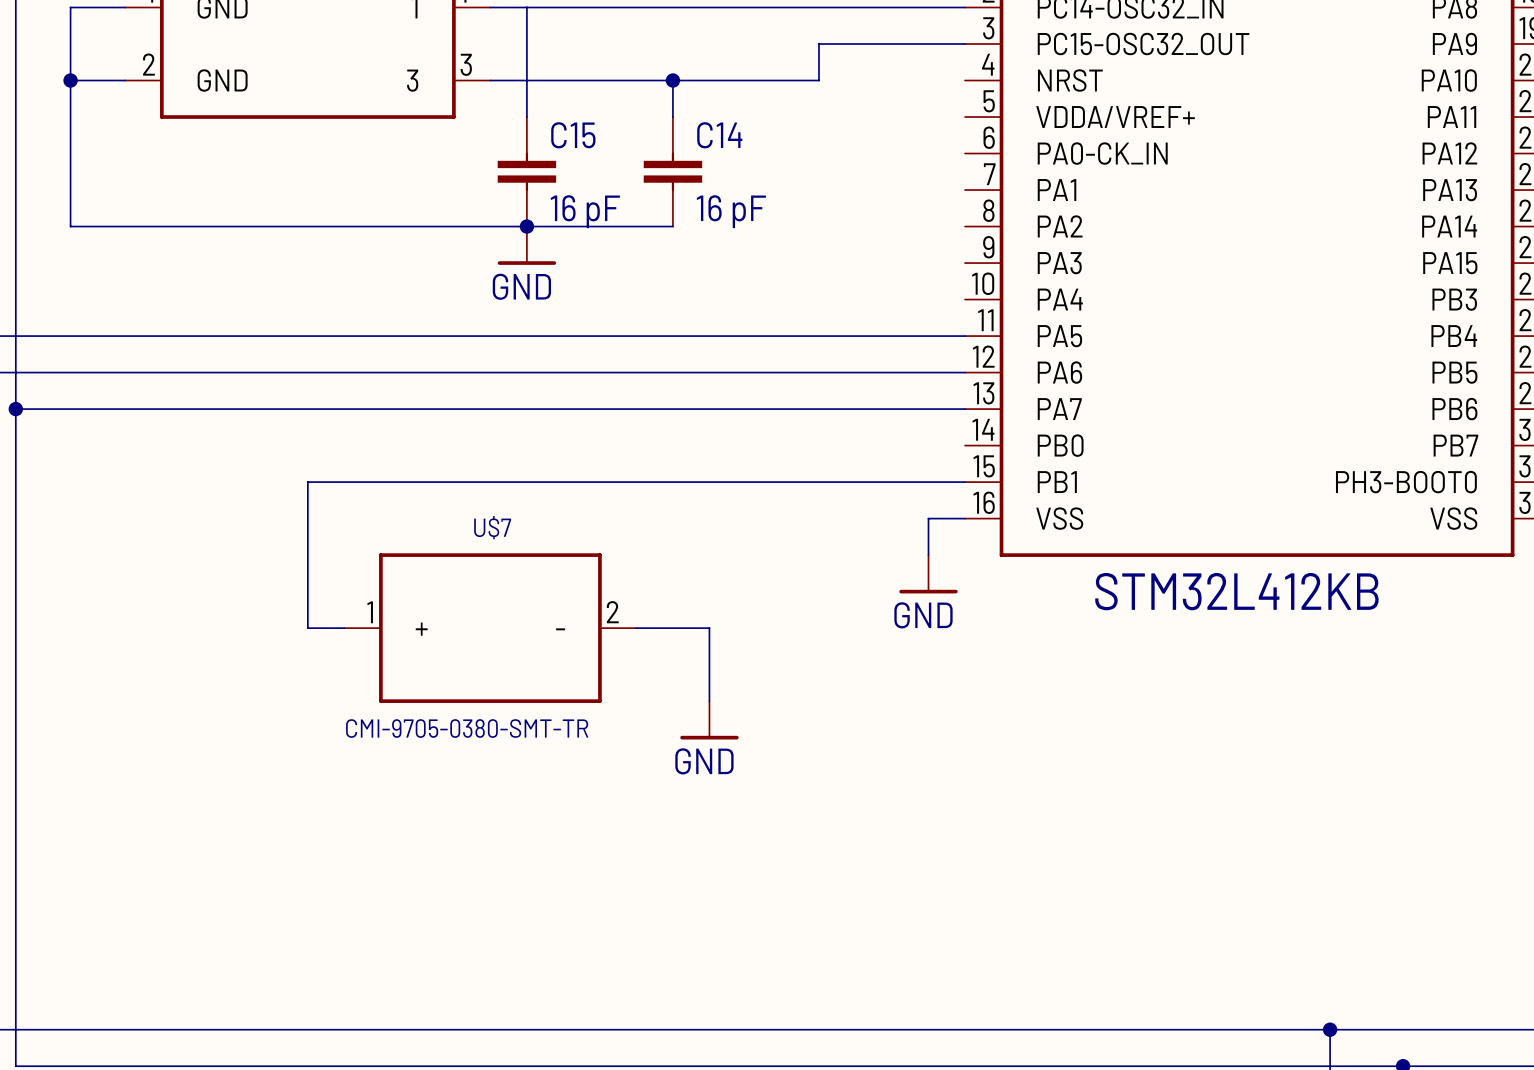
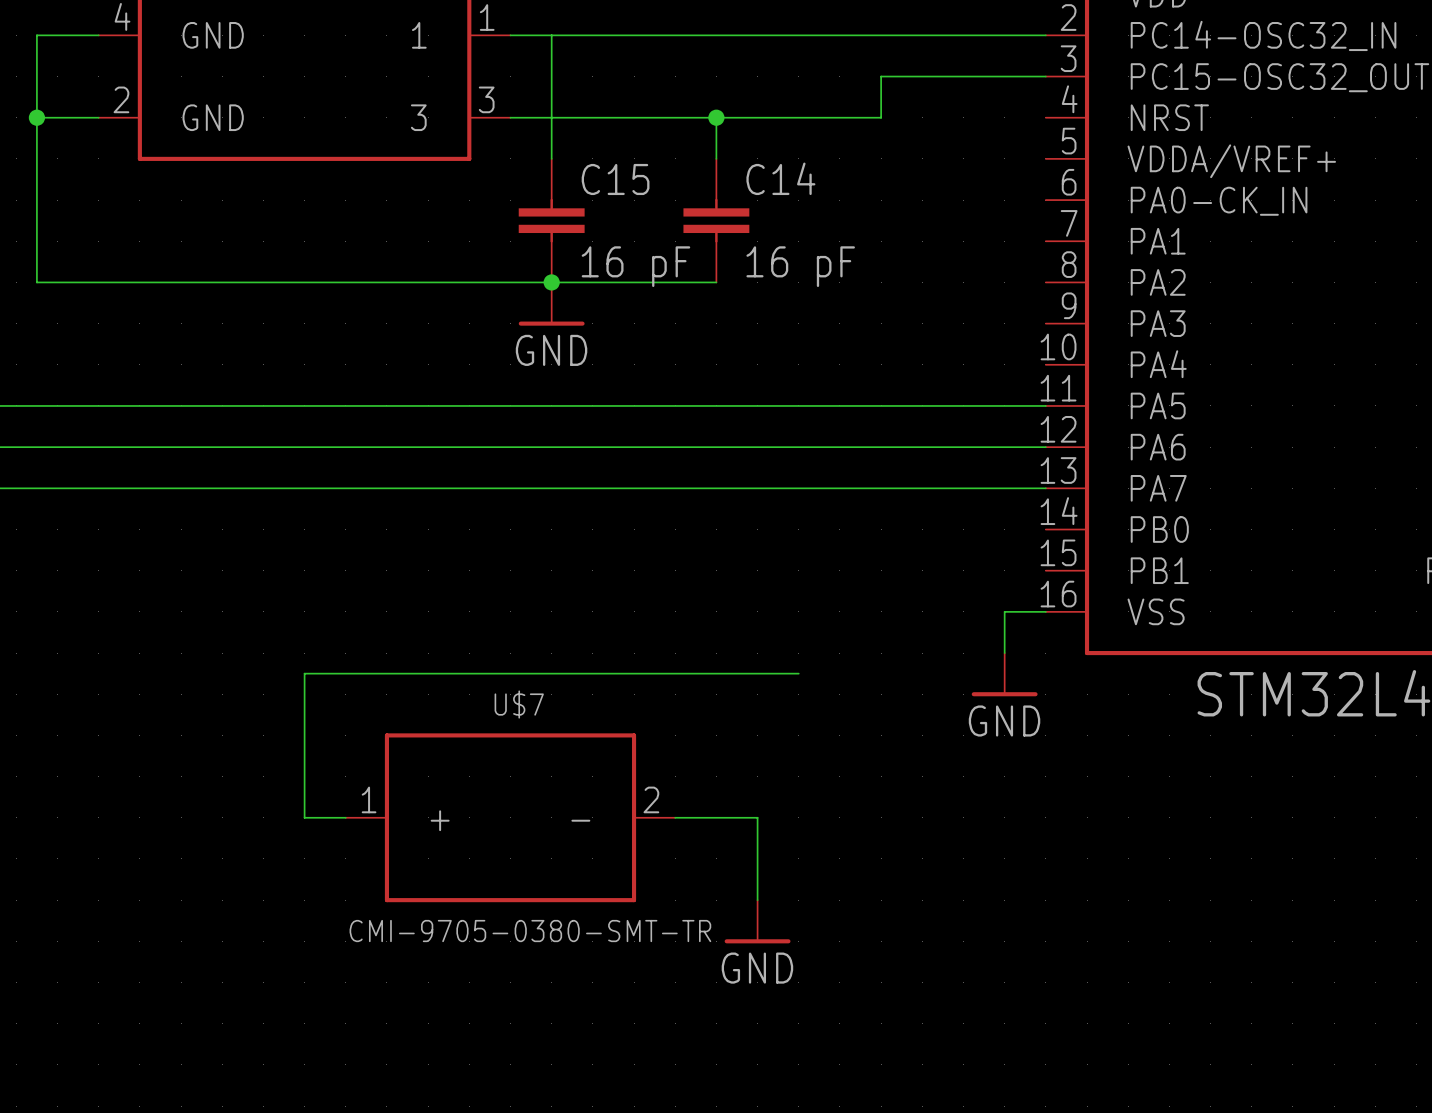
wire: (965, 482) (307, 482) (307, 573) -> (798, 673) (304, 673)
wire: (307, 628) (344, 628) -> (304, 735) (304, 817) (345, 817)
U$7 position: (490, 628) -> (510, 817)
wire: (636, 628) (709, 628) (709, 701) -> (675, 817) (757, 817) (757, 900)
power symbol position: GND (709, 720) -> GND (757, 921)

